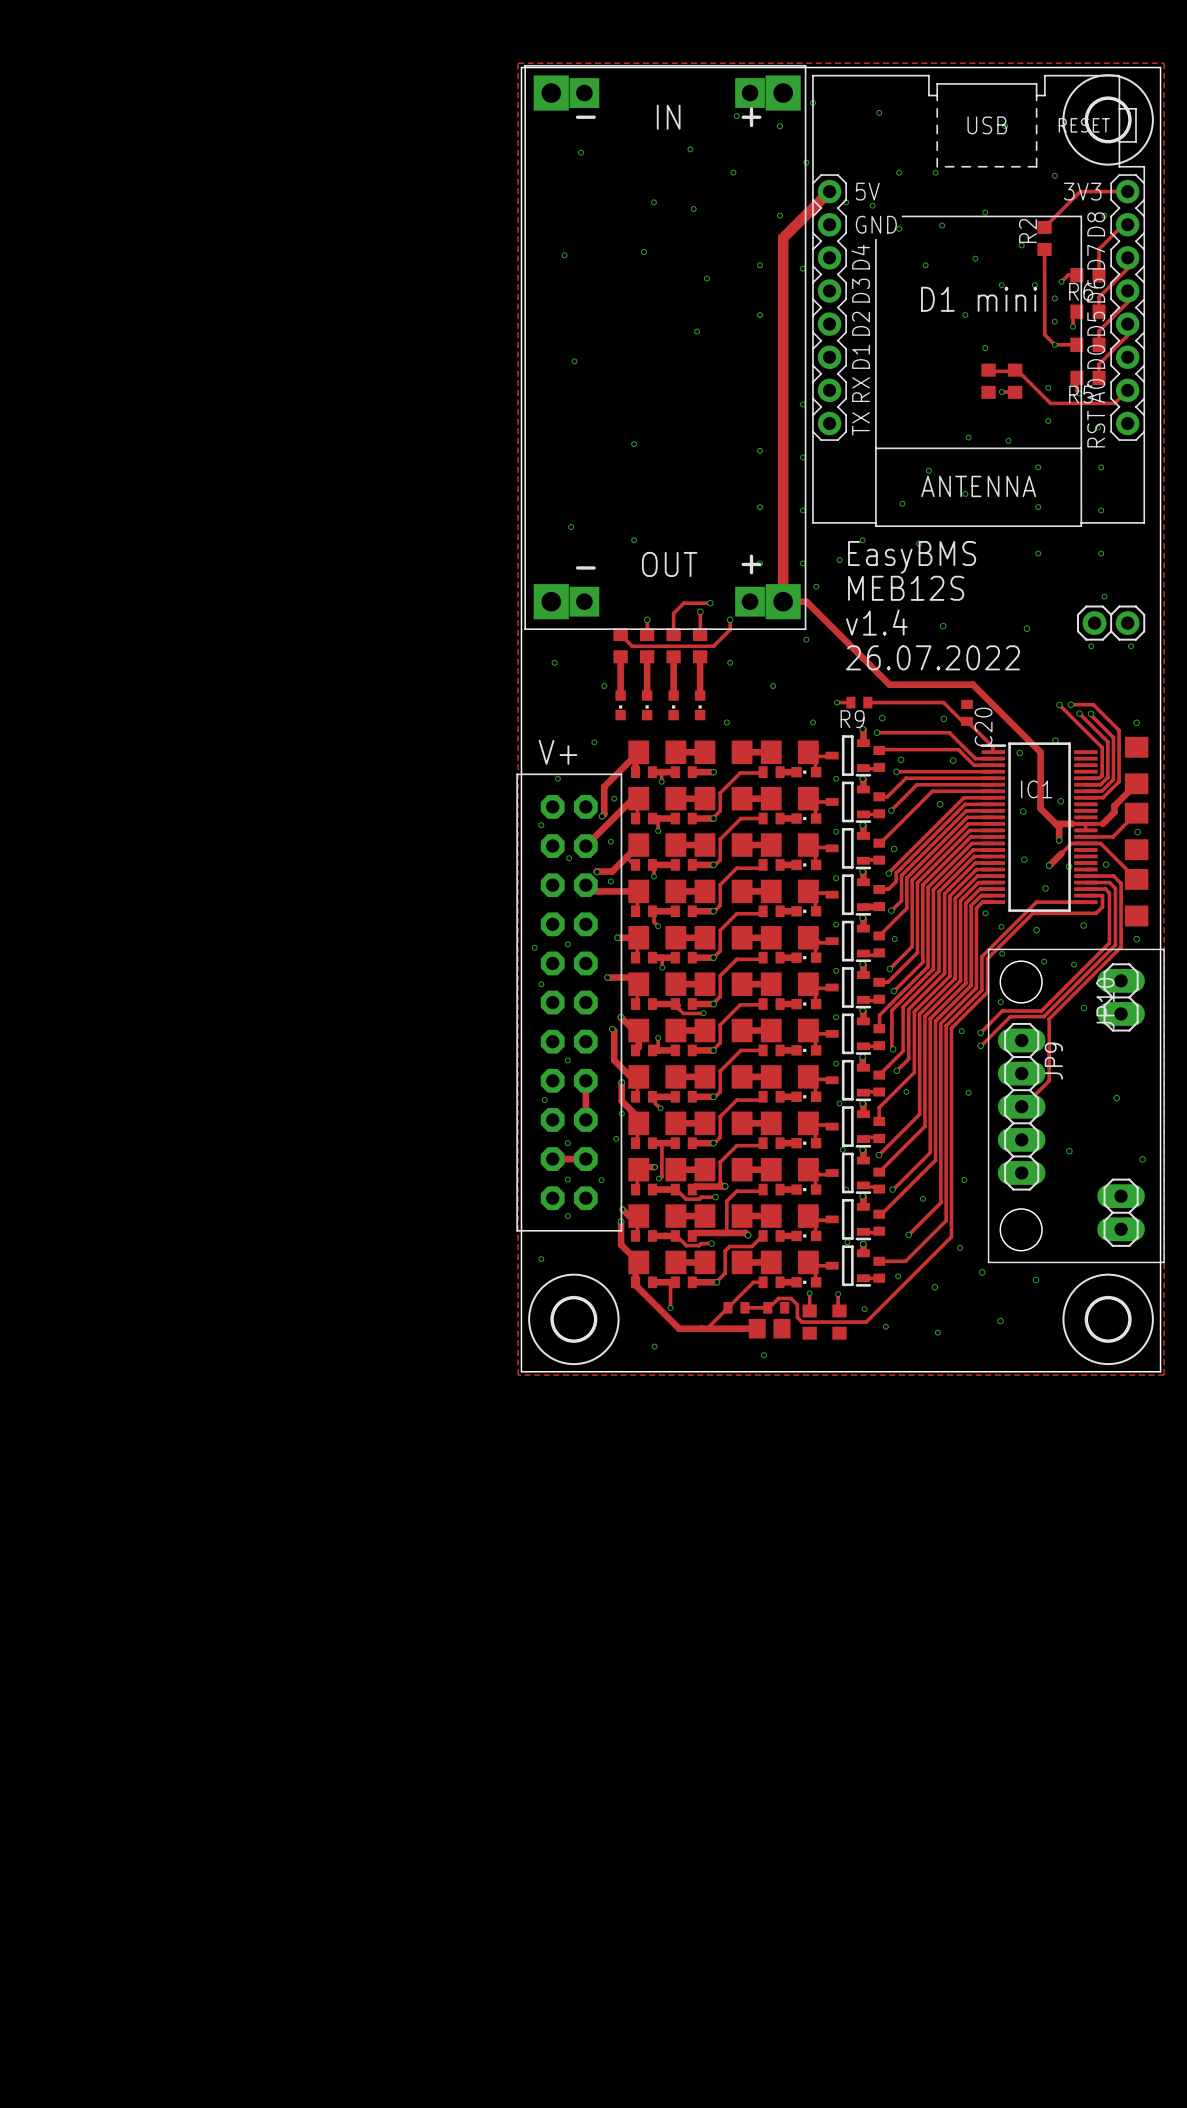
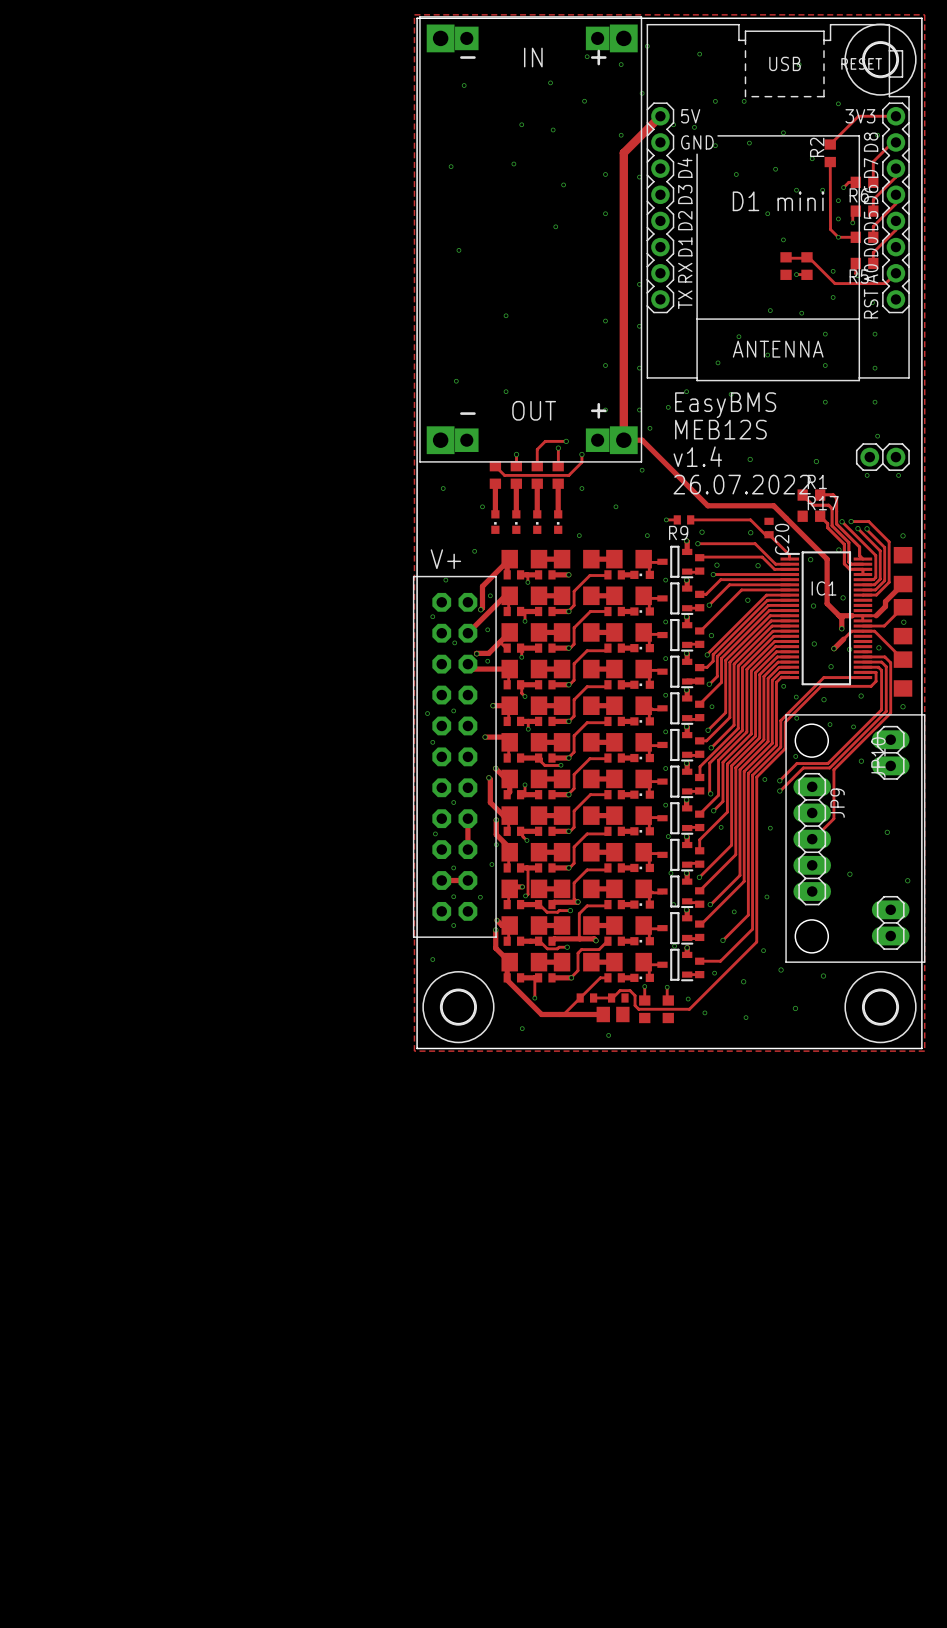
track: none -> (802, 495) (812, 505) (828, 505) (832, 508) (832, 525) (848, 542) (848, 562) (851, 564) (862, 564)
R1: none -> (811, 495)
track: none -> (820, 495) (833, 494) (836, 498) (836, 524) (859, 547) (859, 555) (862, 559)
R17: none -> (811, 516)
track: none -> (820, 516) (827, 523) (827, 527) (844, 544) (844, 563) (849, 569) (862, 569) (862, 574)

